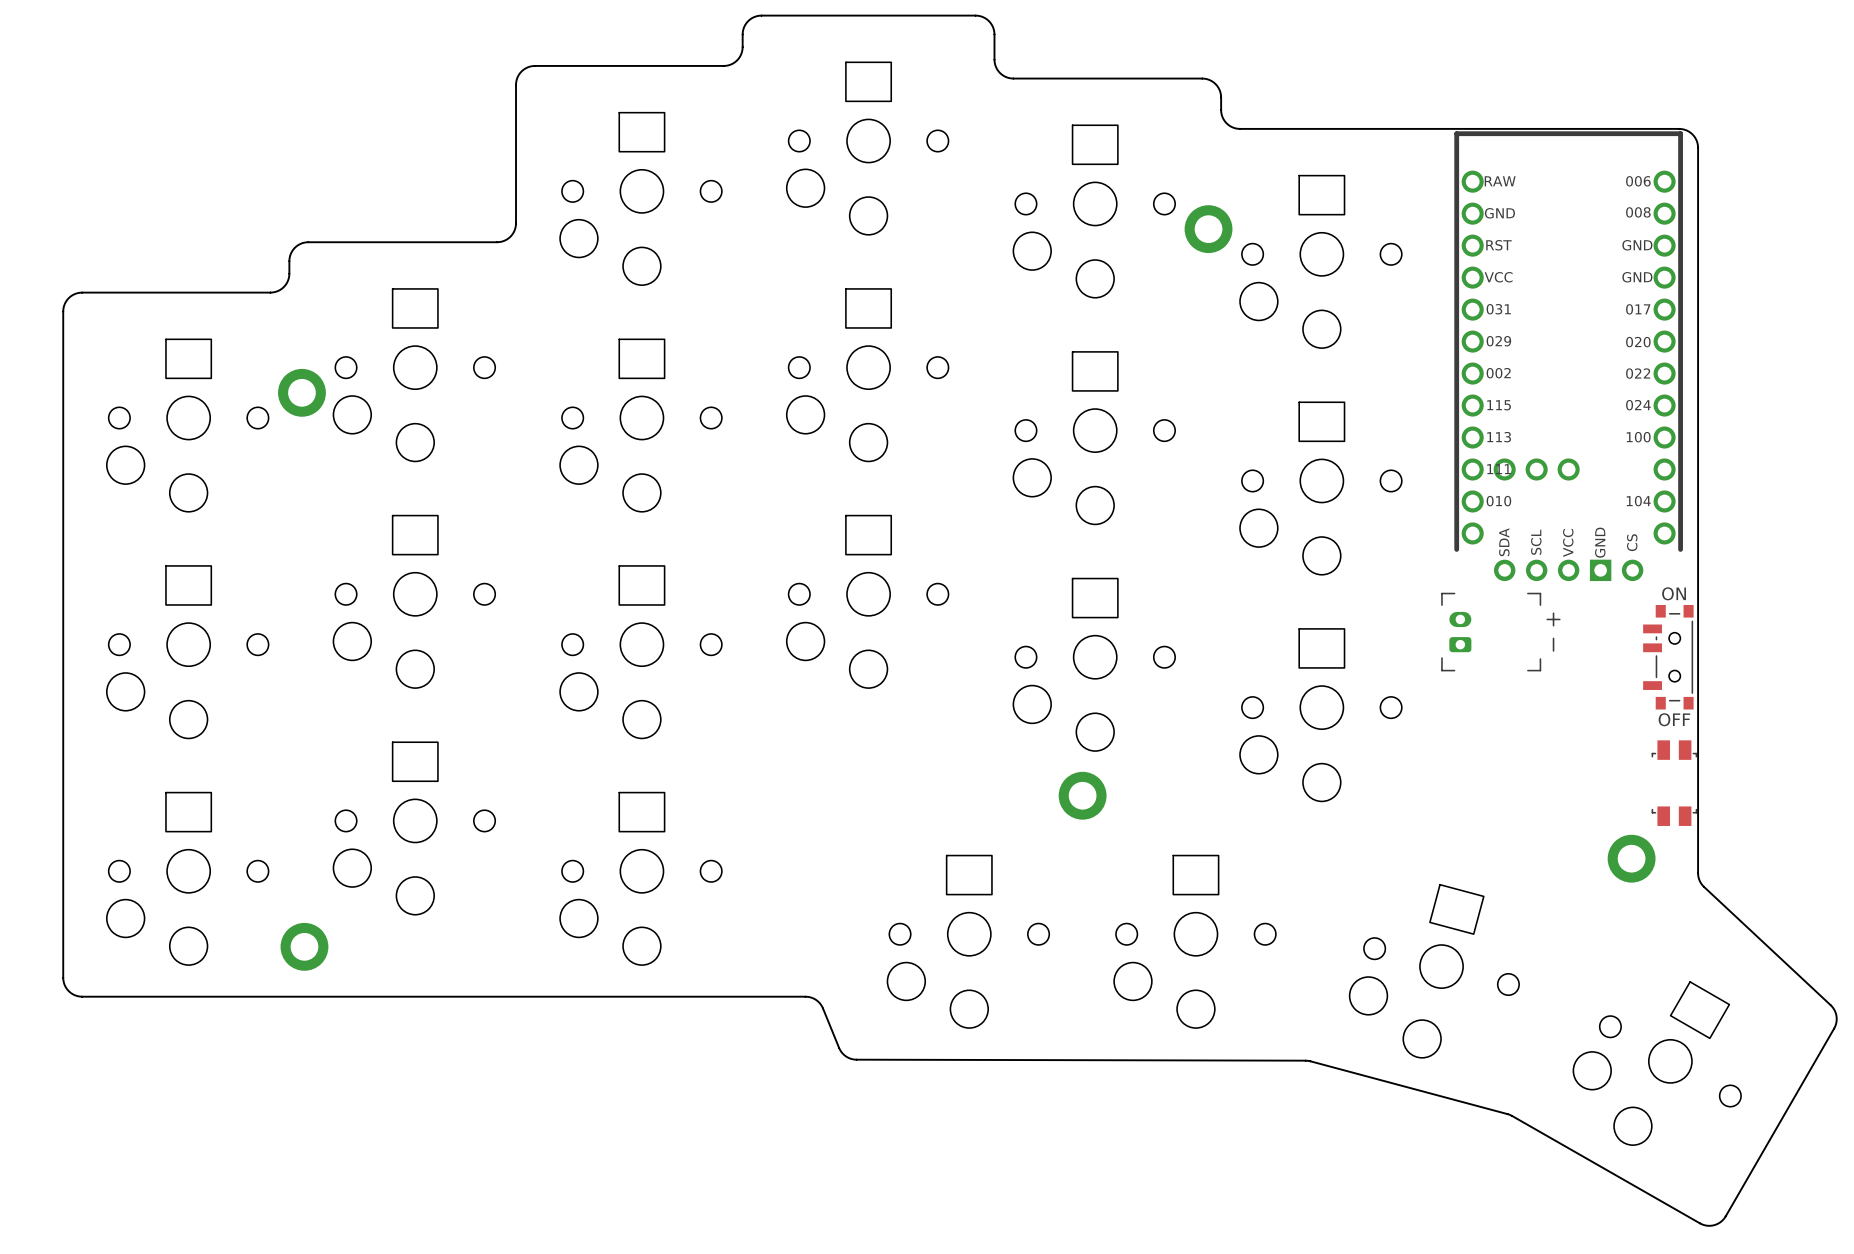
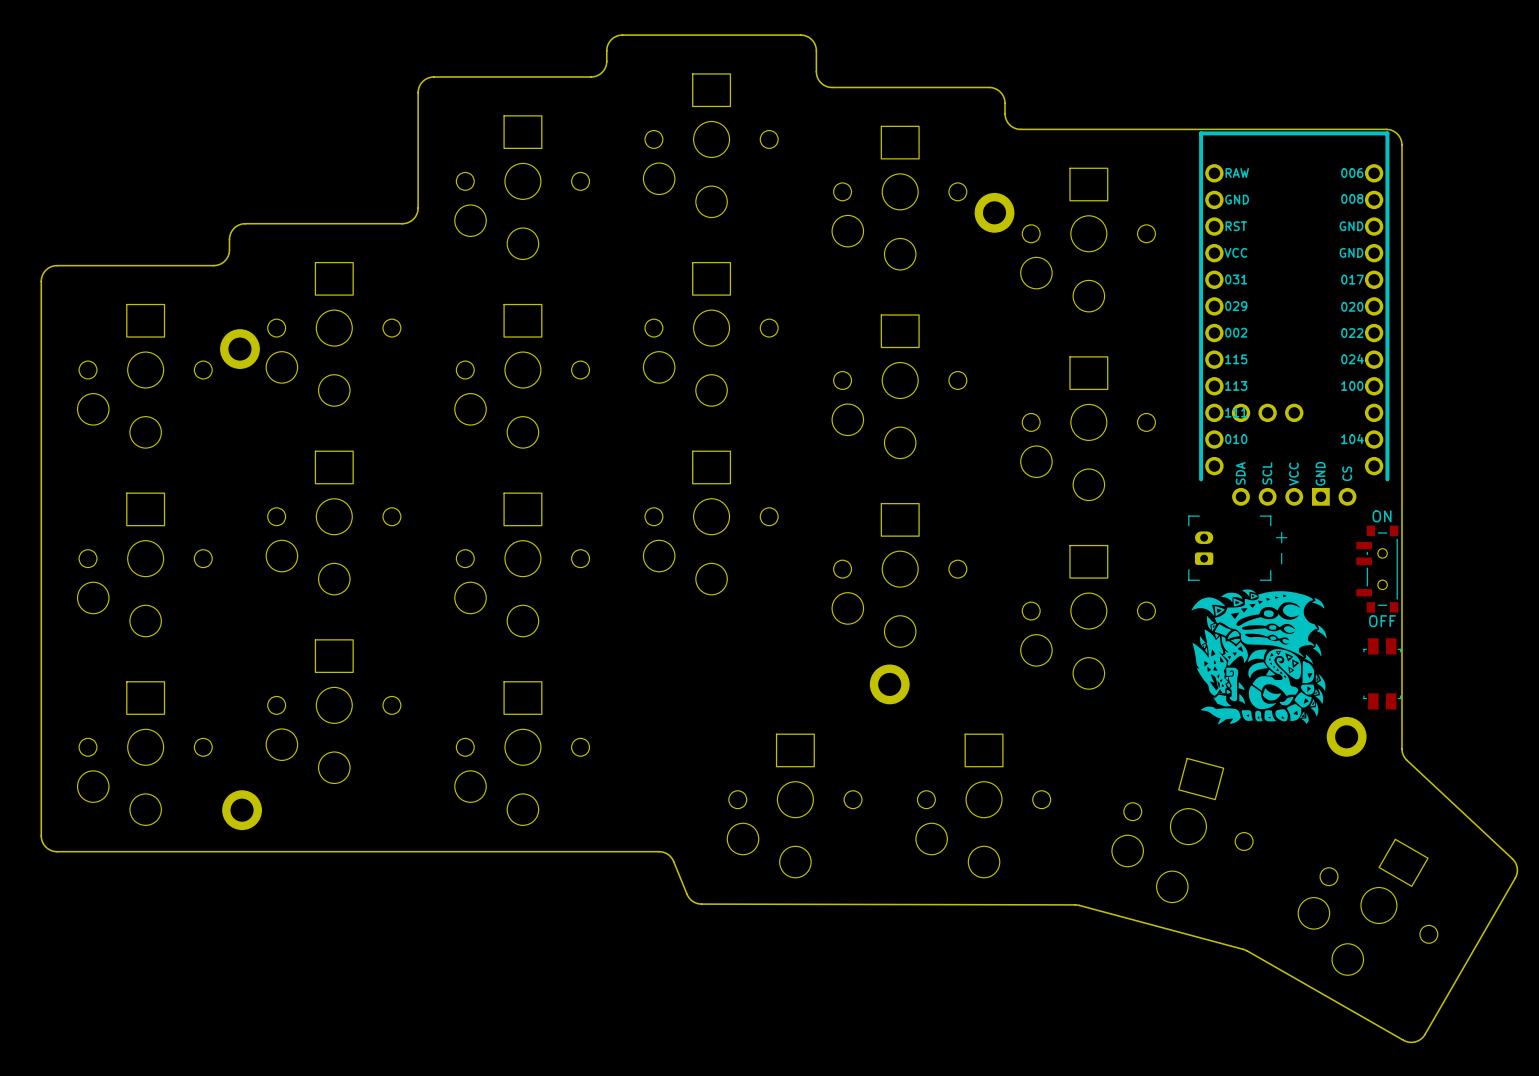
drawing: none -> [1191, 589, 1327, 725]

